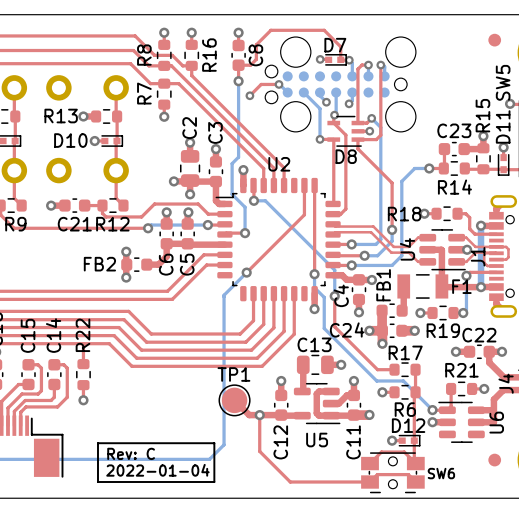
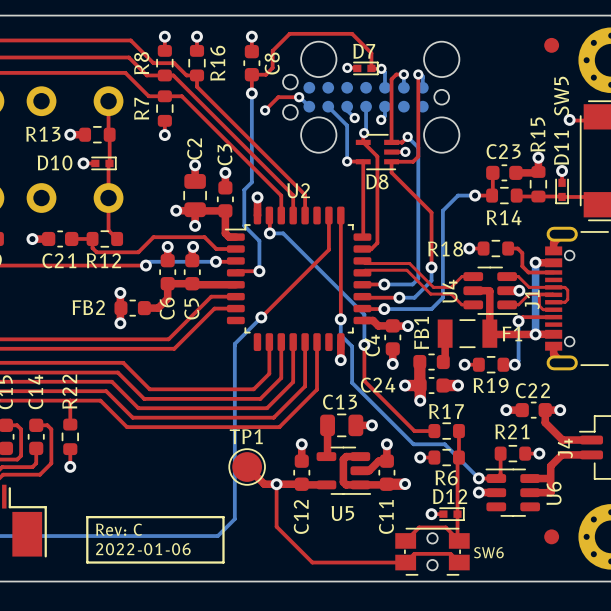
text: 2022-01-04 (157, 470) -> 2022-01-06 (143, 549)

